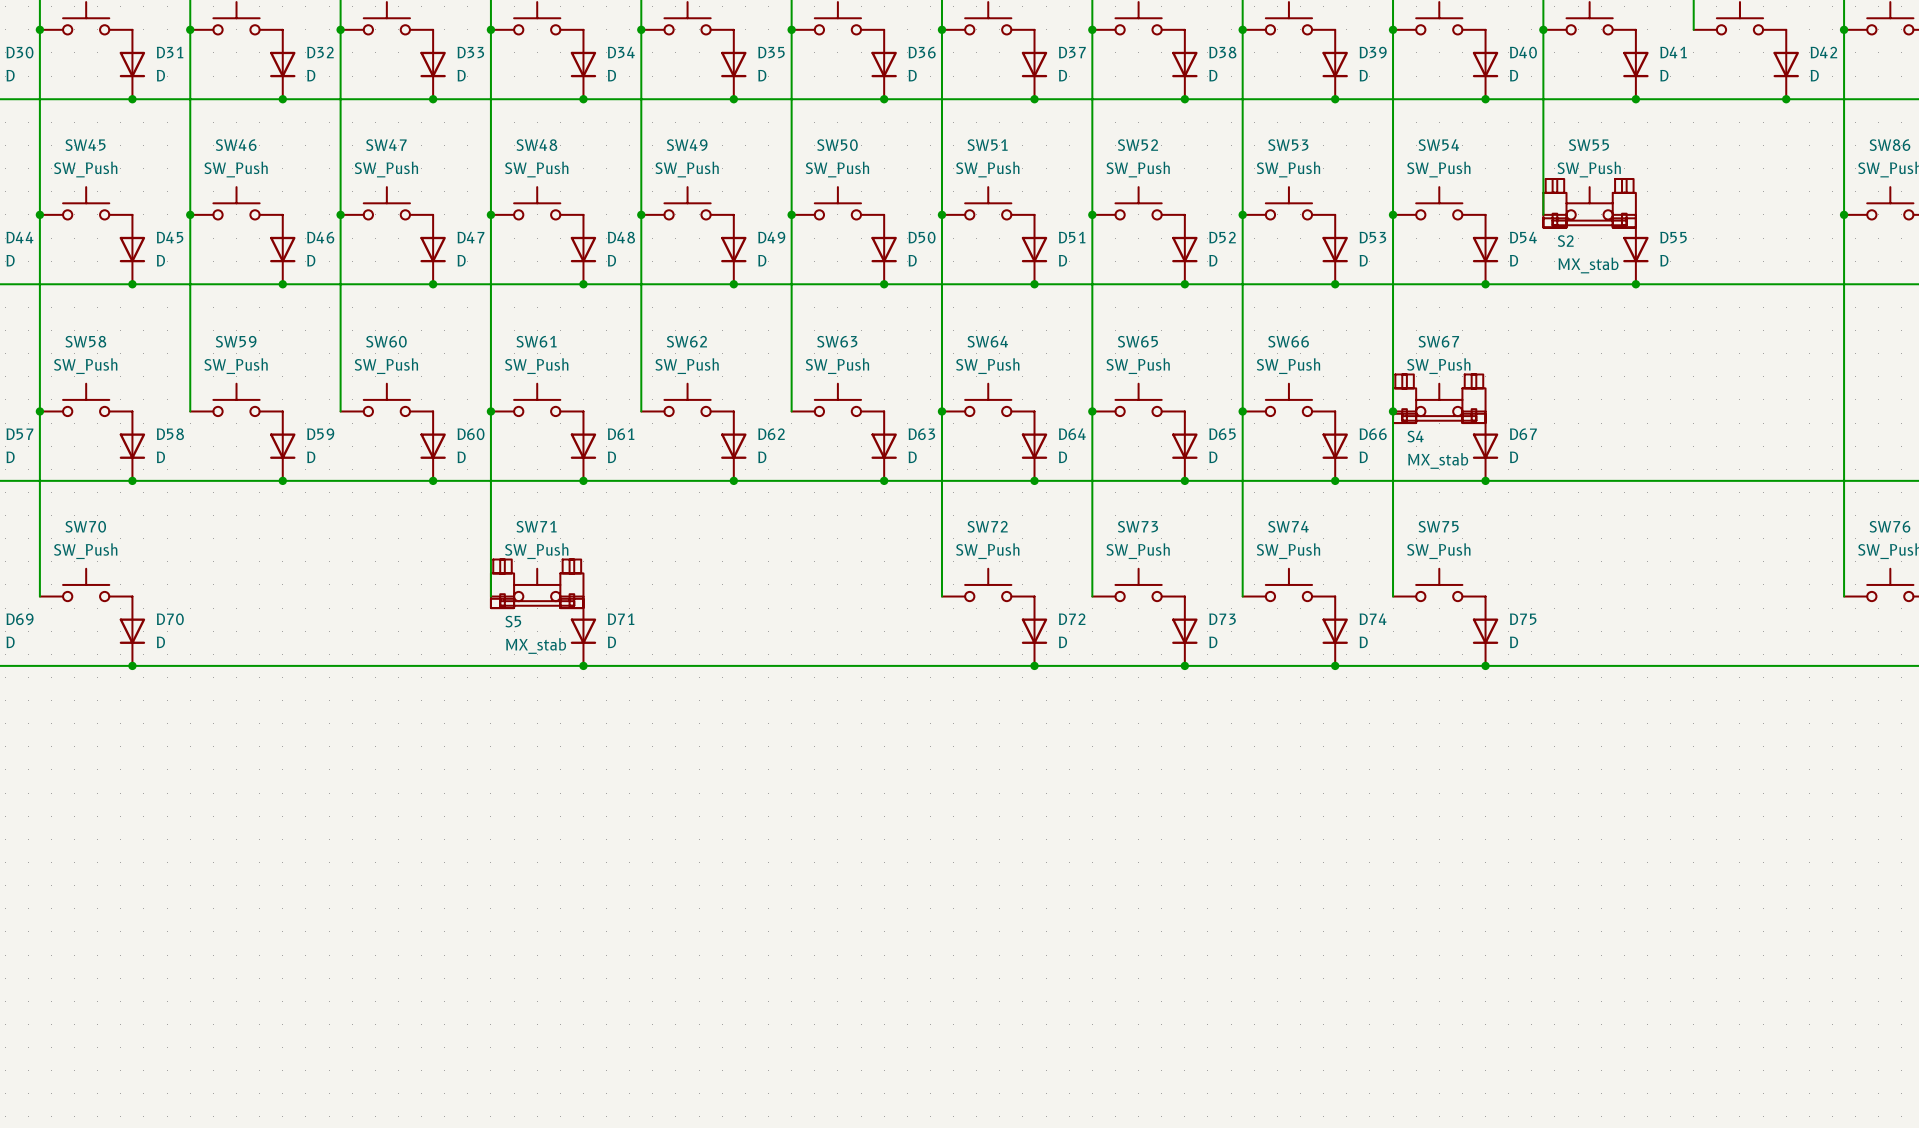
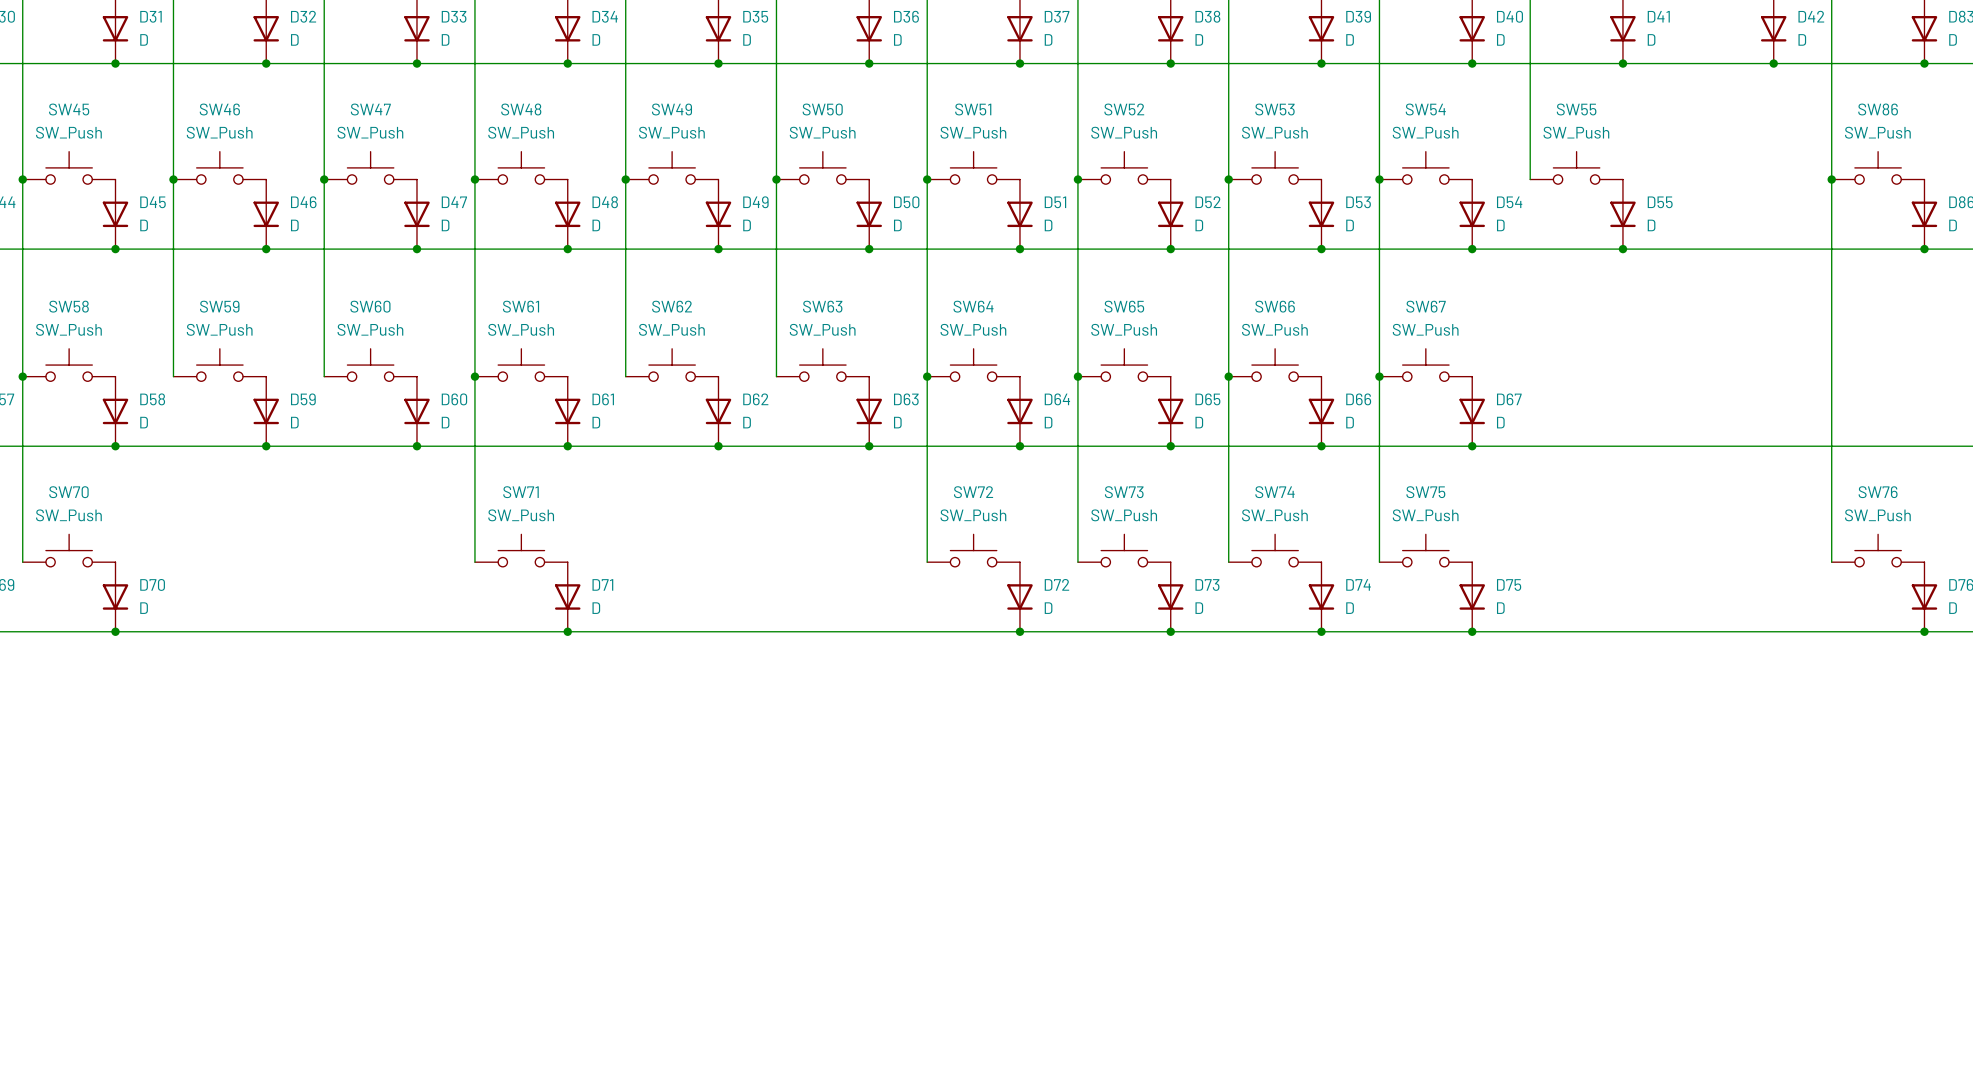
S2: MX_stab (1589, 203) -> none
S4: MX_stab (1439, 398) -> none
S5: MX_stab (537, 583) -> none

